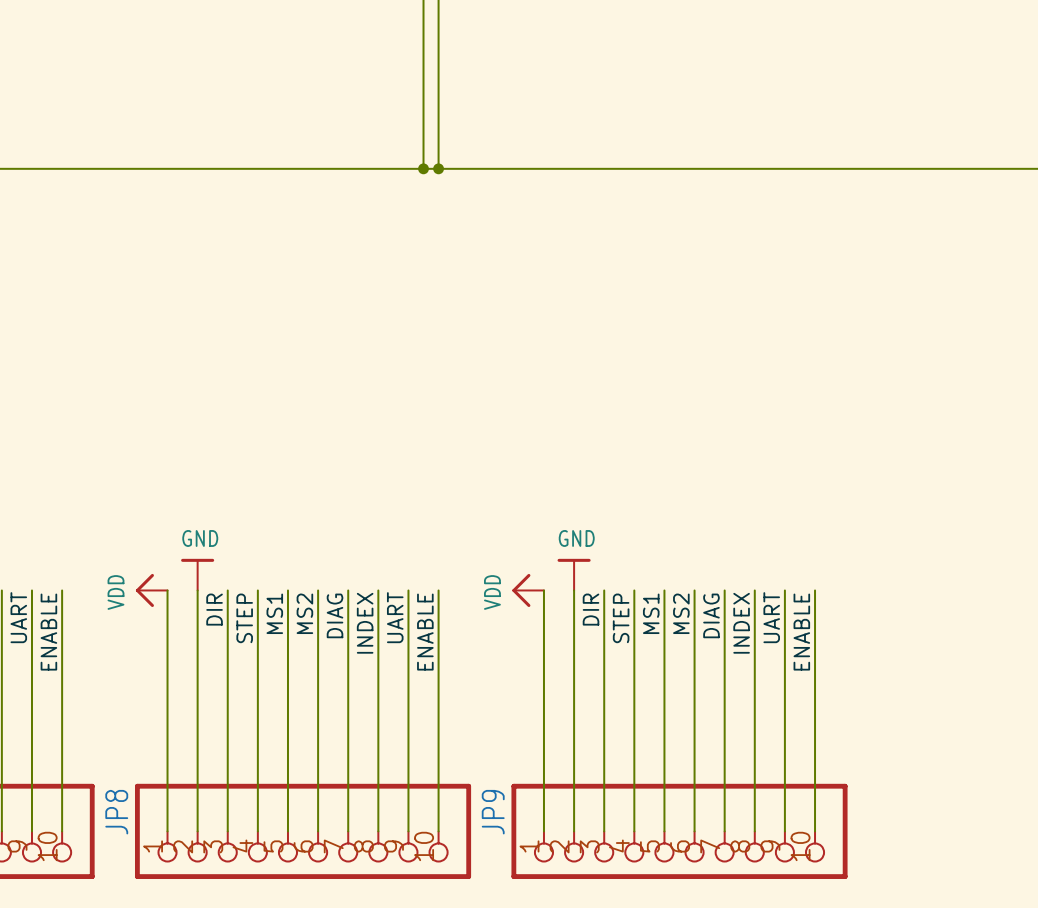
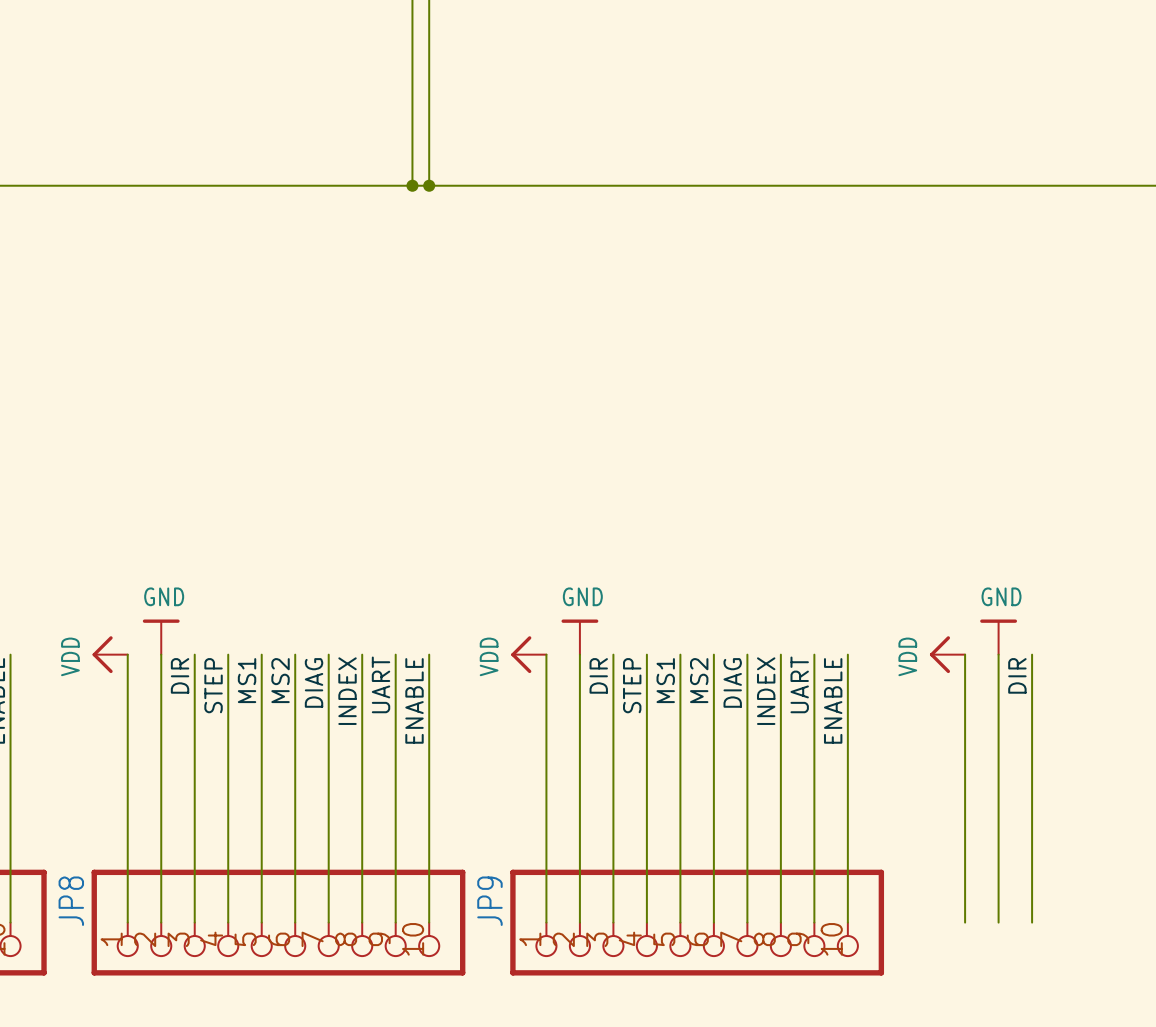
power symbol: none -> GND (998, 637)
power symbol: none -> VDD (947, 654)
wire: none -> (965, 654) (965, 922)
wire: none -> (998, 654) (998, 922)
wire: none -> (1032, 654) (1032, 922)
label: none -> DIR (1017, 675)

